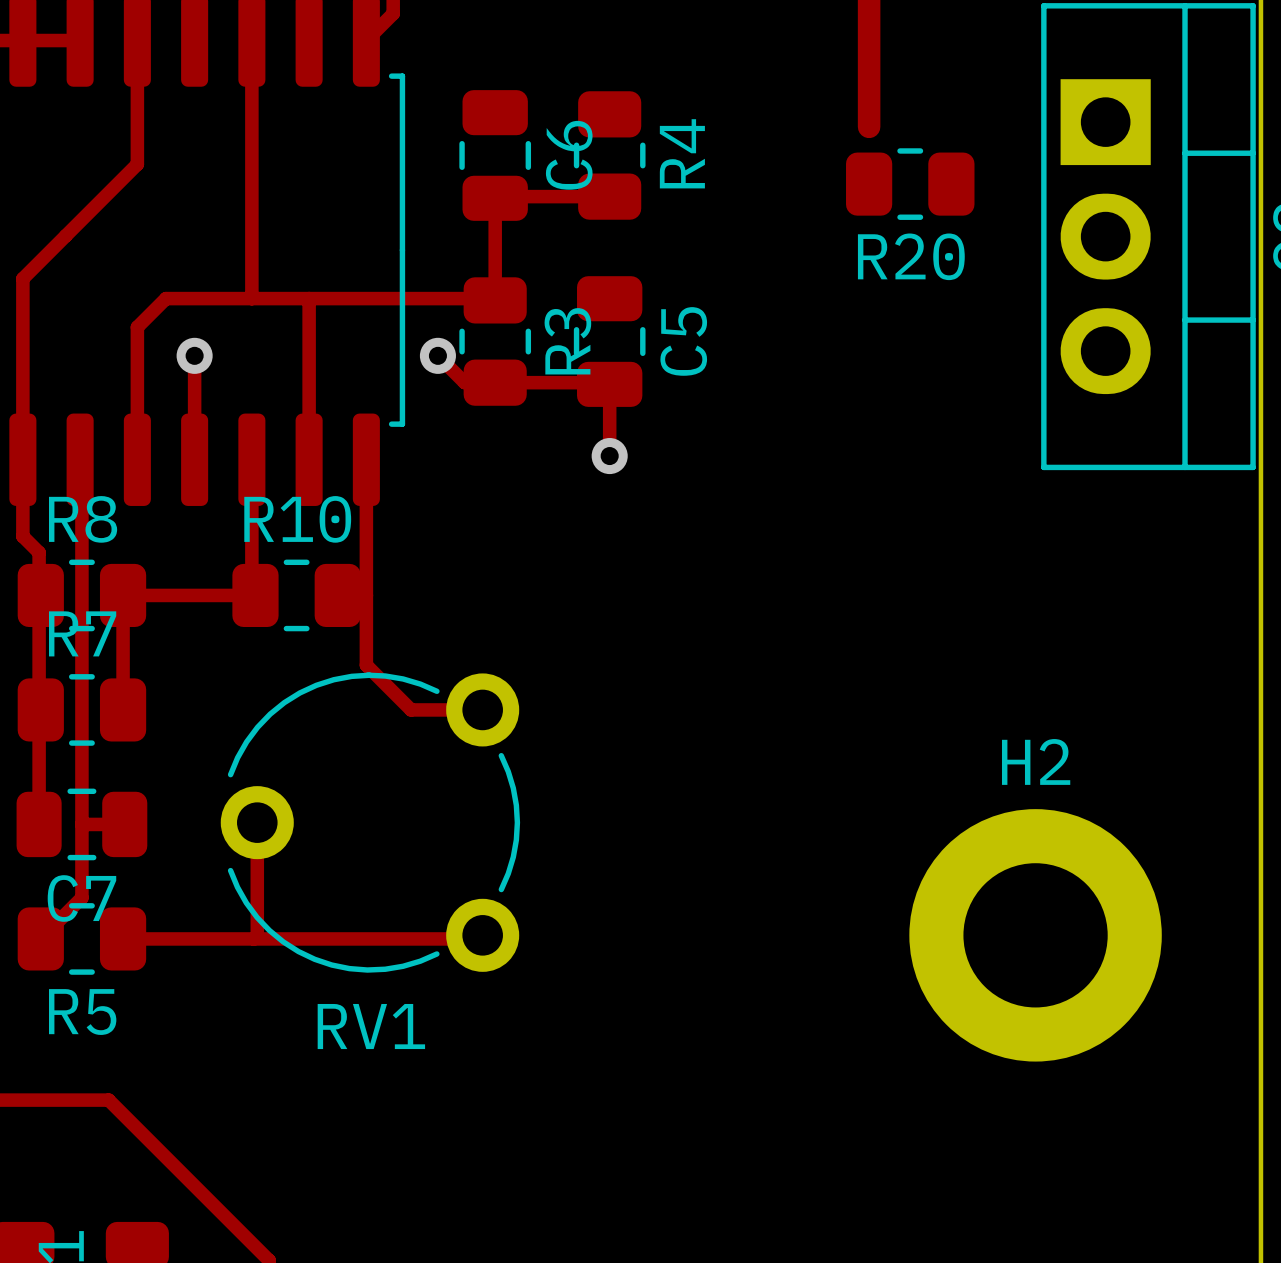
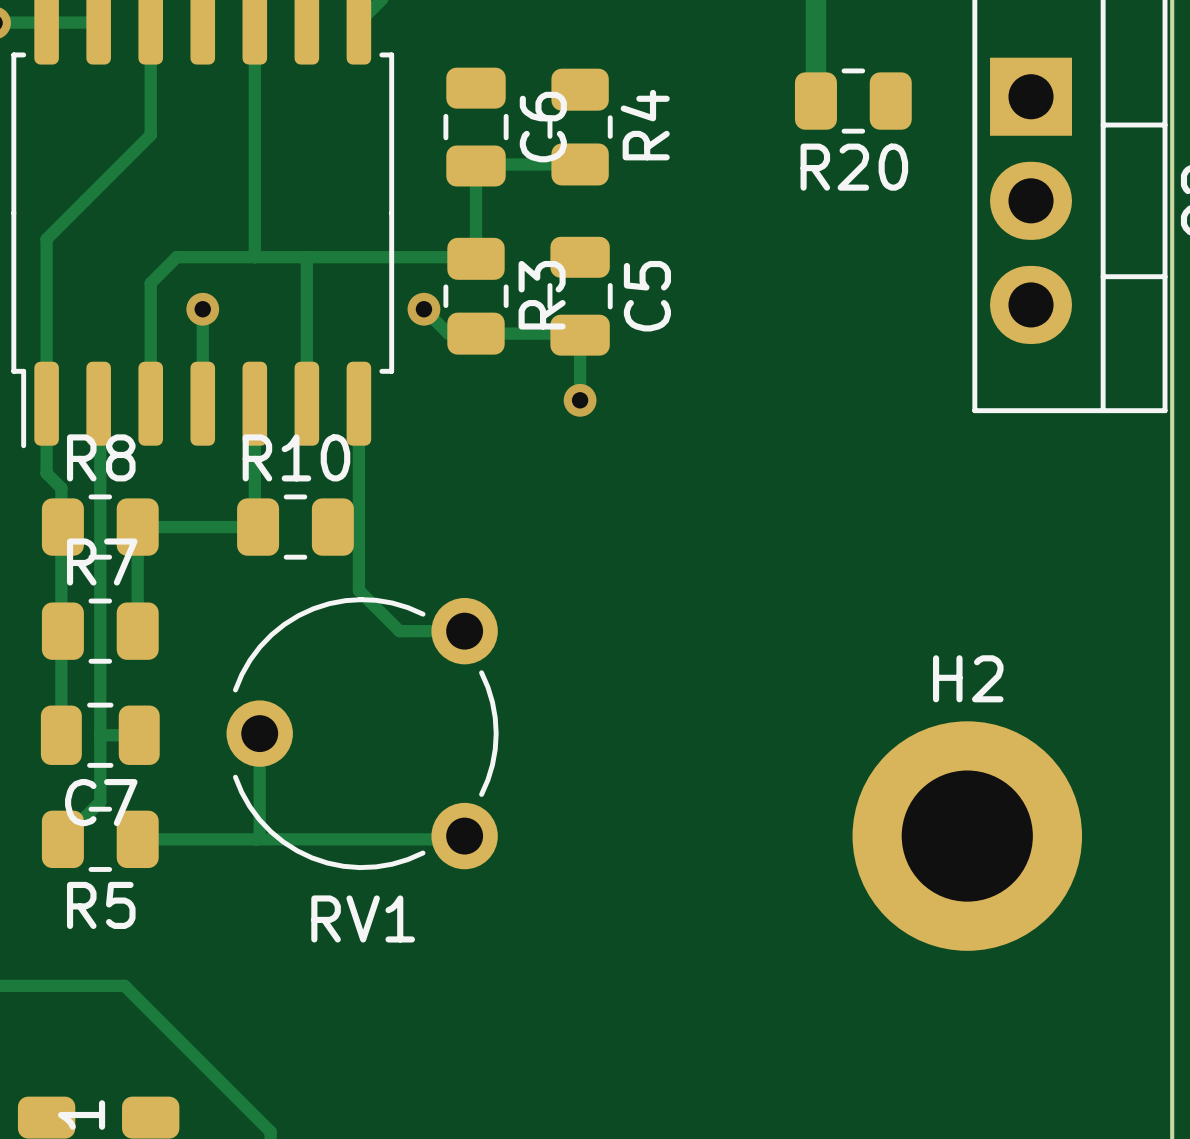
R20 position: (910, 184) -> (853, 101)

